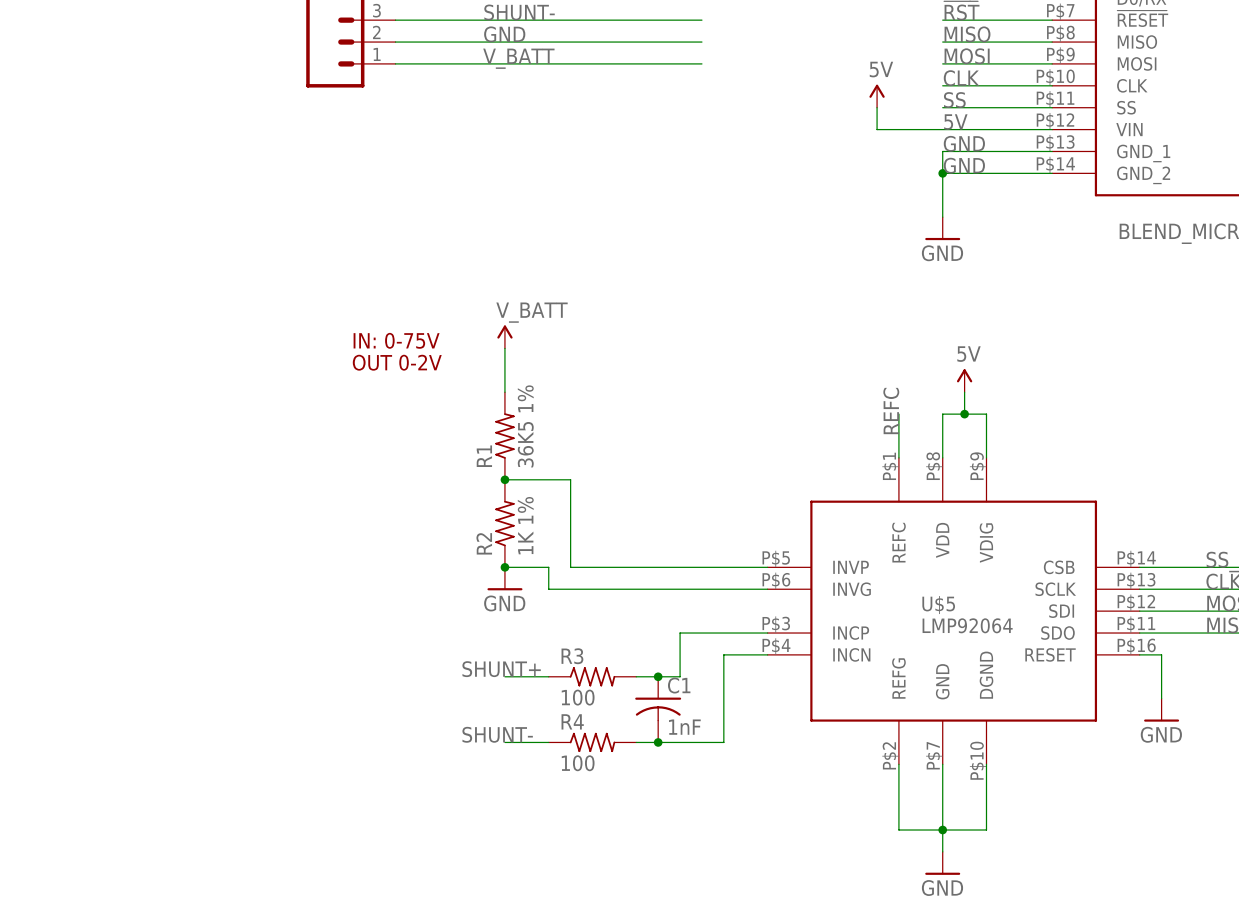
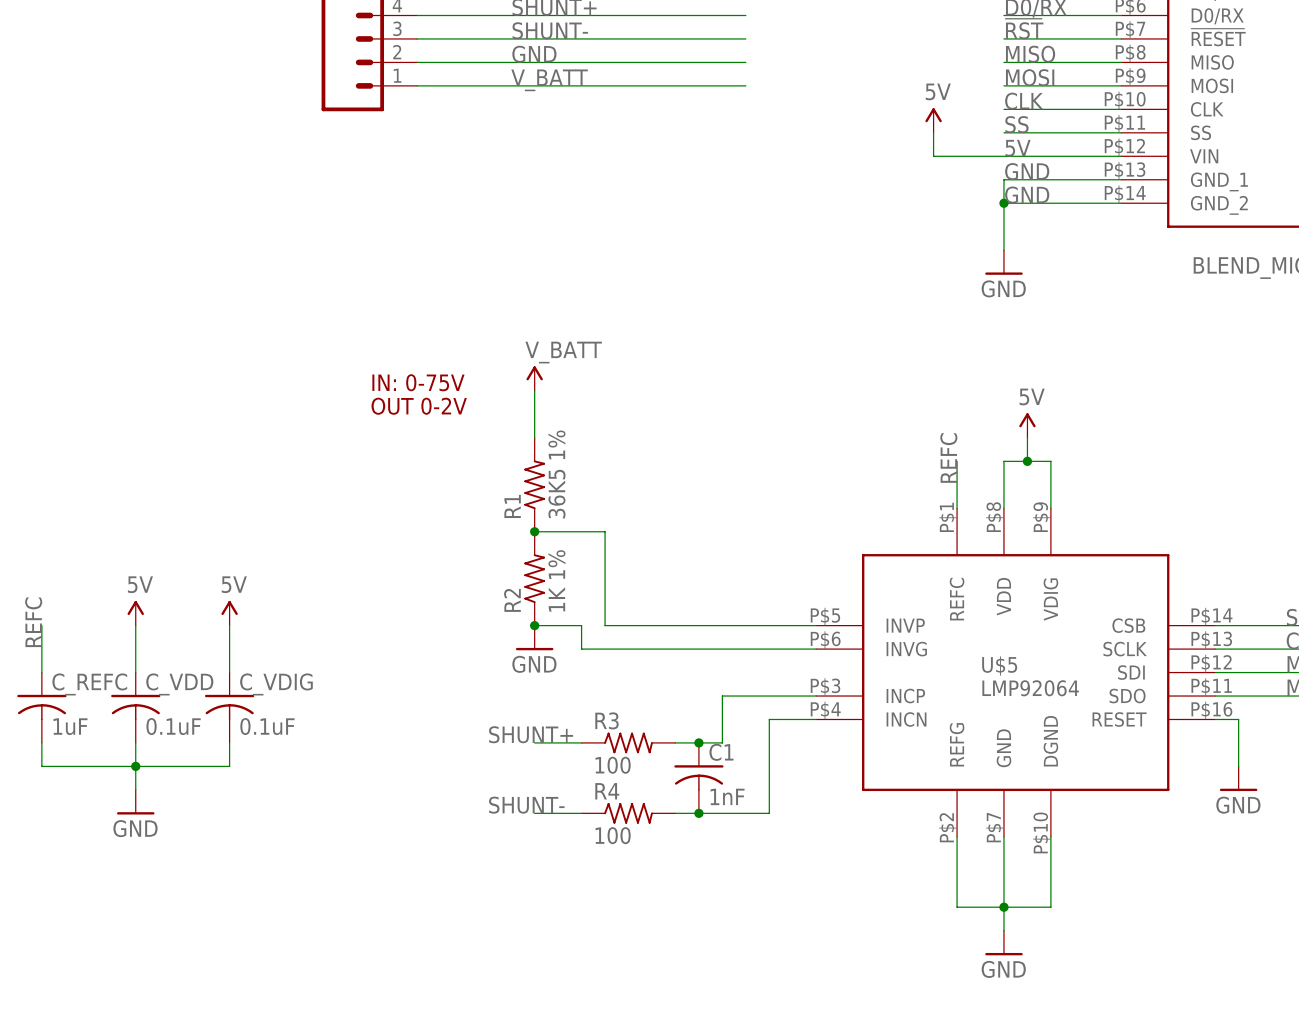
power symbol: none -> 5V (135, 613)
power symbol: none -> 5V (229, 613)
label: none -> REFC (33, 622)
wire: none -> (41, 625) (41, 672)
wire: none -> (135, 625) (135, 672)
wire: none -> (229, 625) (229, 672)
C_REFC: none -> 1uF (41, 707)
C_VDD: none -> 0.1uF (135, 707)
C_VDIG: none -> 0.1uF (229, 707)
wire: none -> (41, 742) (41, 766) (229, 766) (229, 742)
wire: none -> (135, 742) (135, 789)
junction: none -> (135, 766)
power symbol: none -> GND (135, 802)

